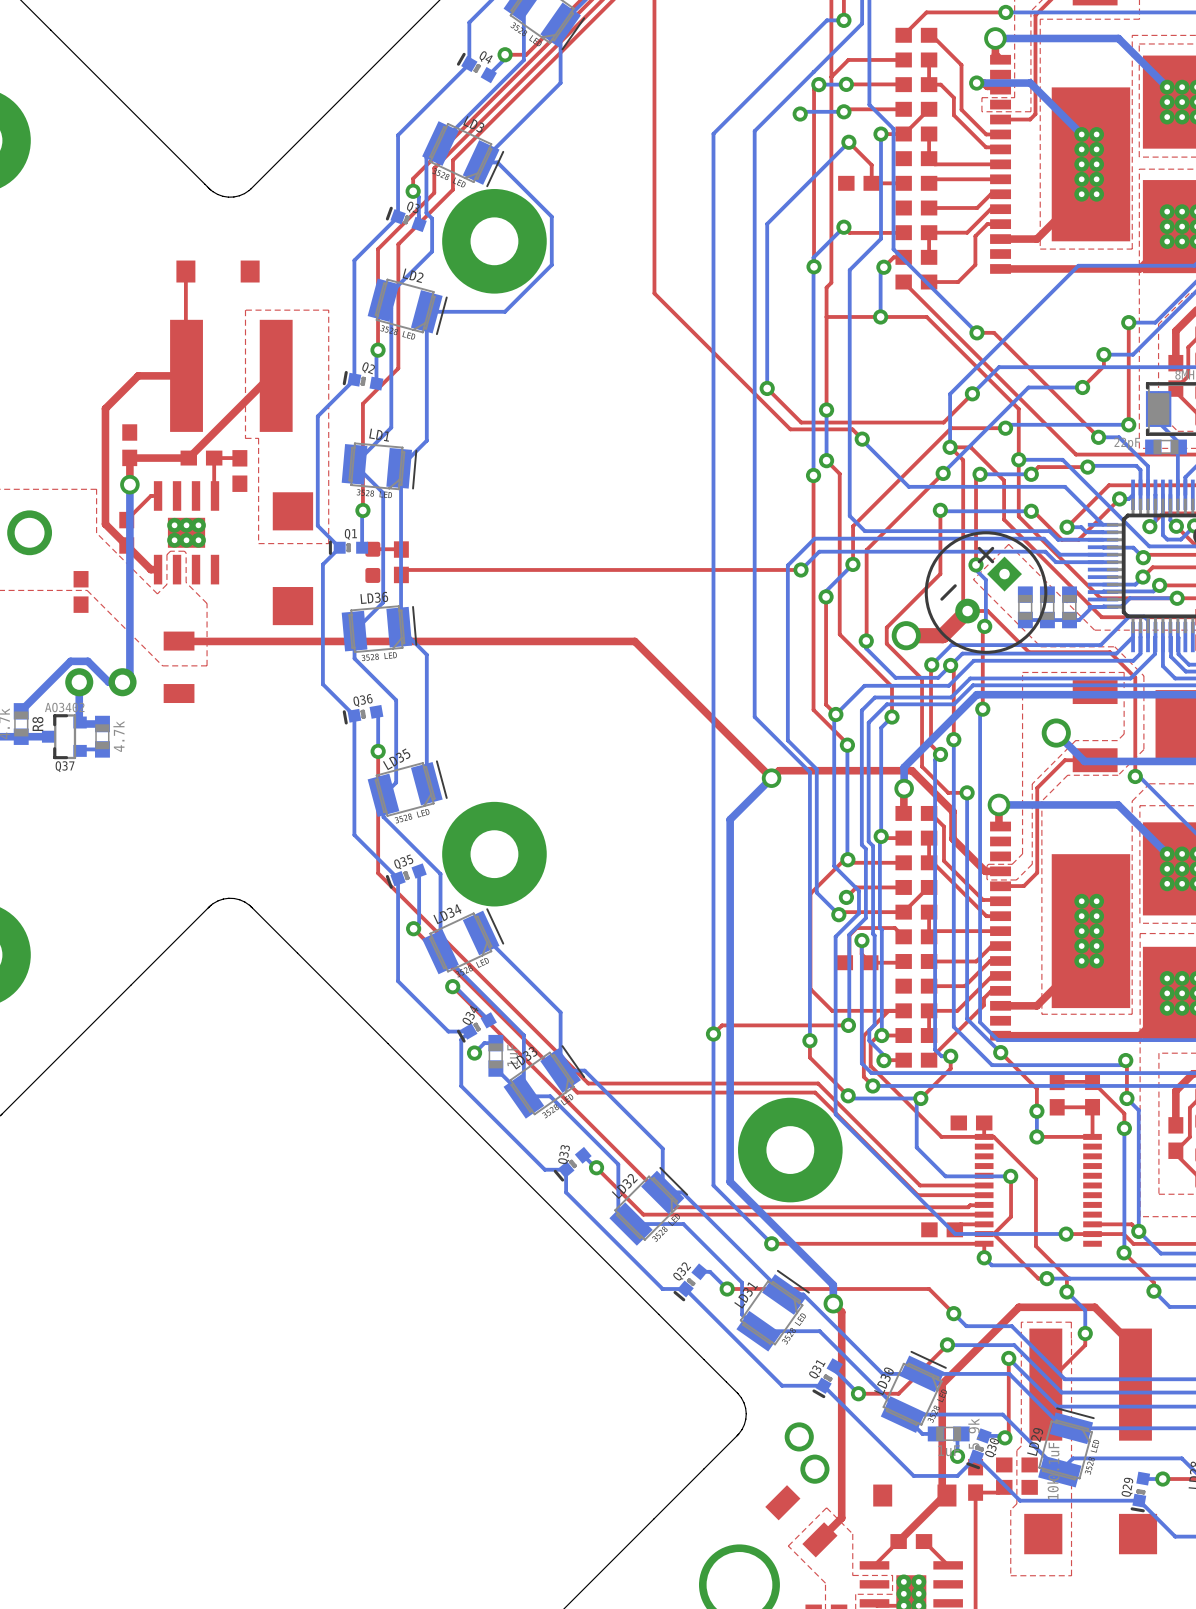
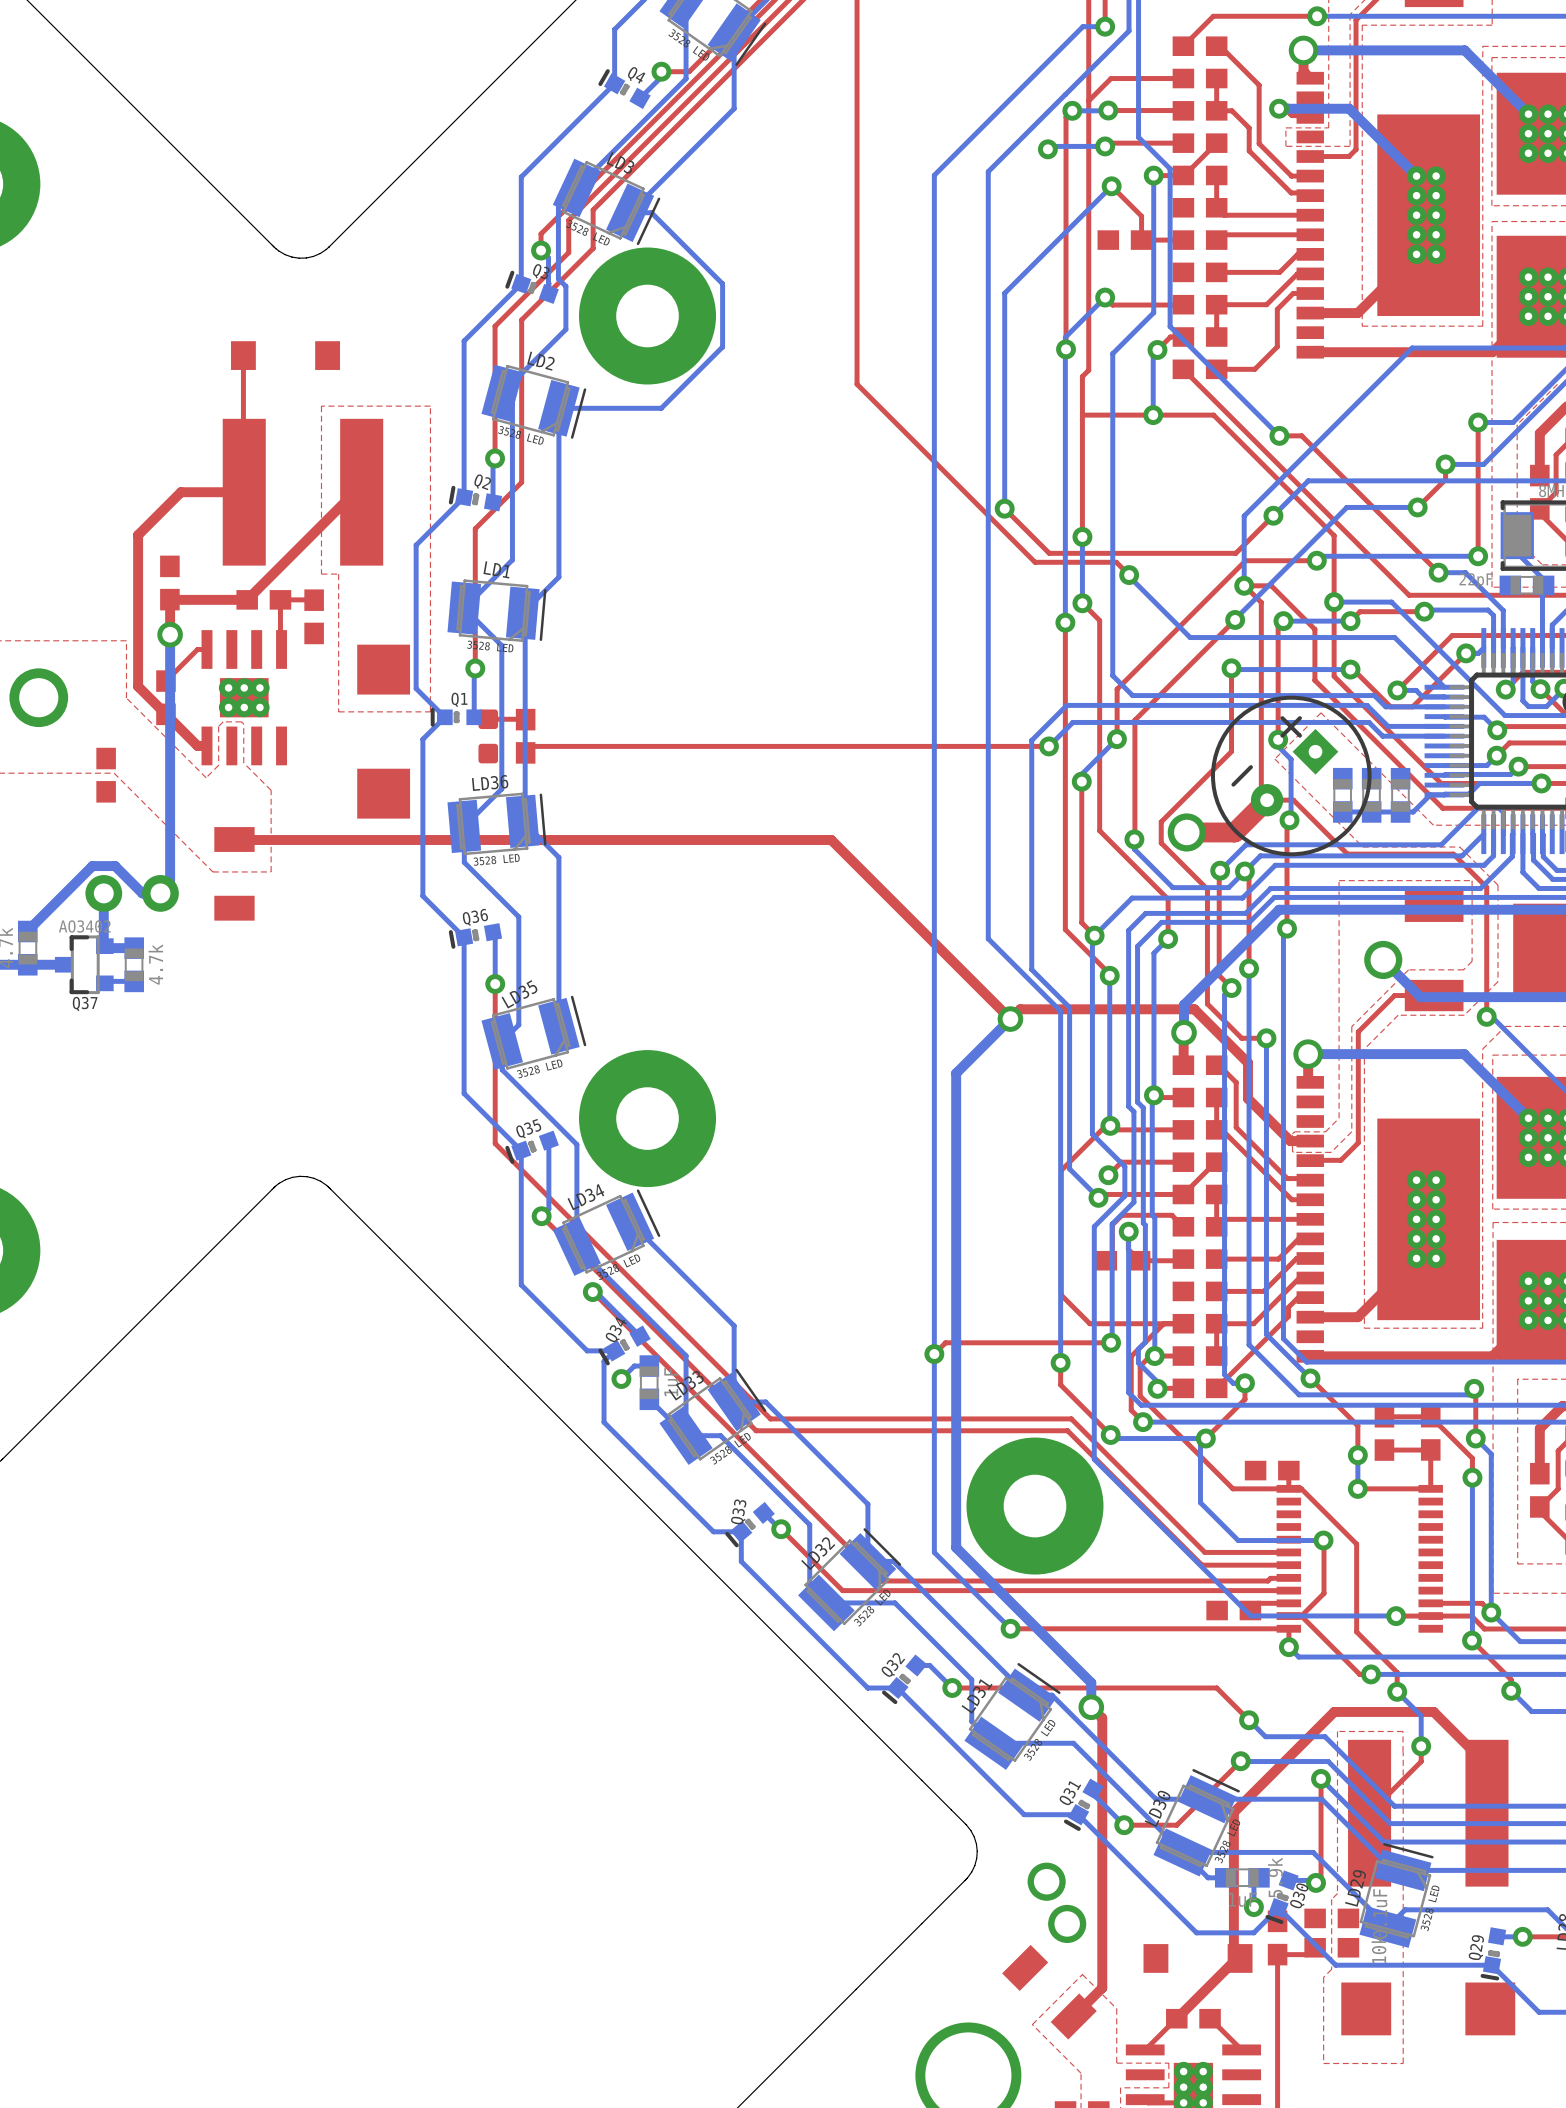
R8 name: R8 (37, 723) -> none

